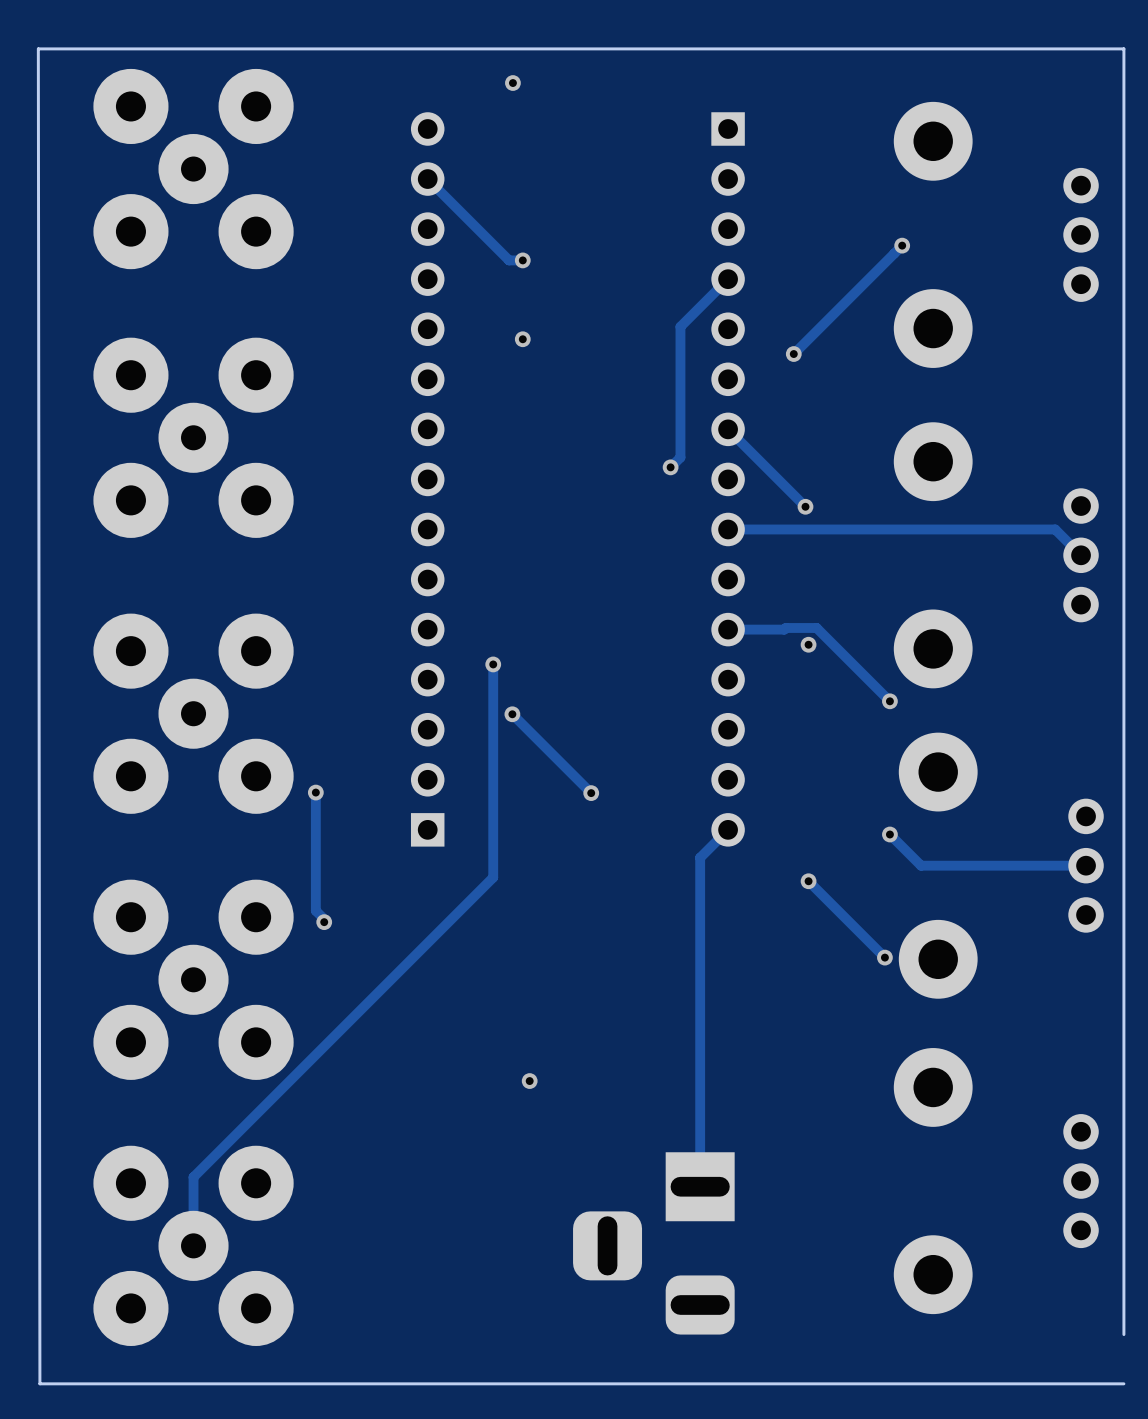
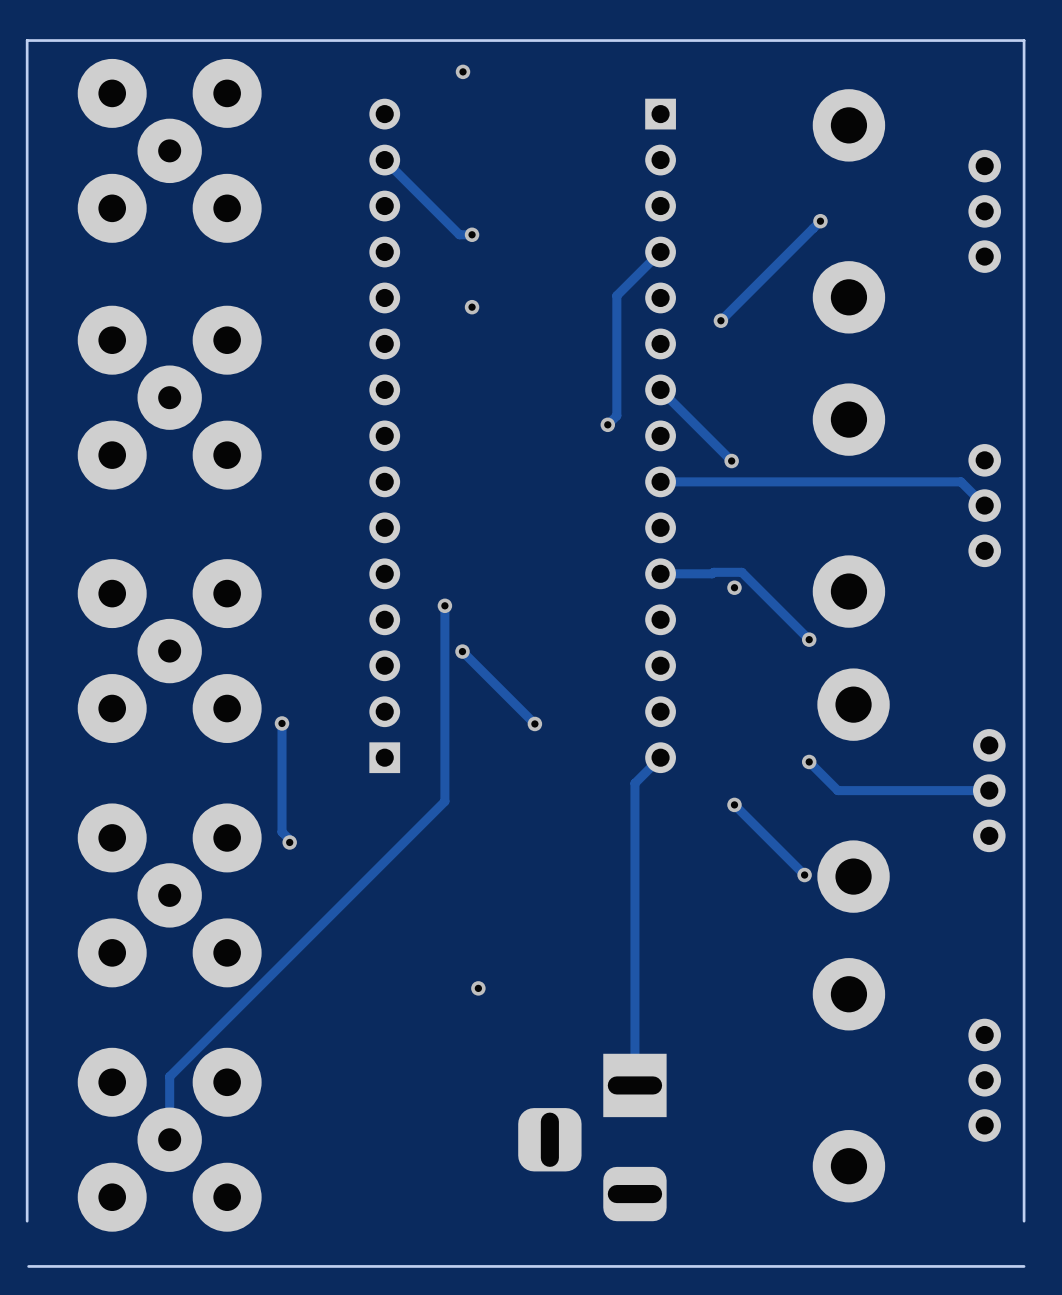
board edge: (38, 48) (39, 1383) -> (27, 40) (27, 1221)

